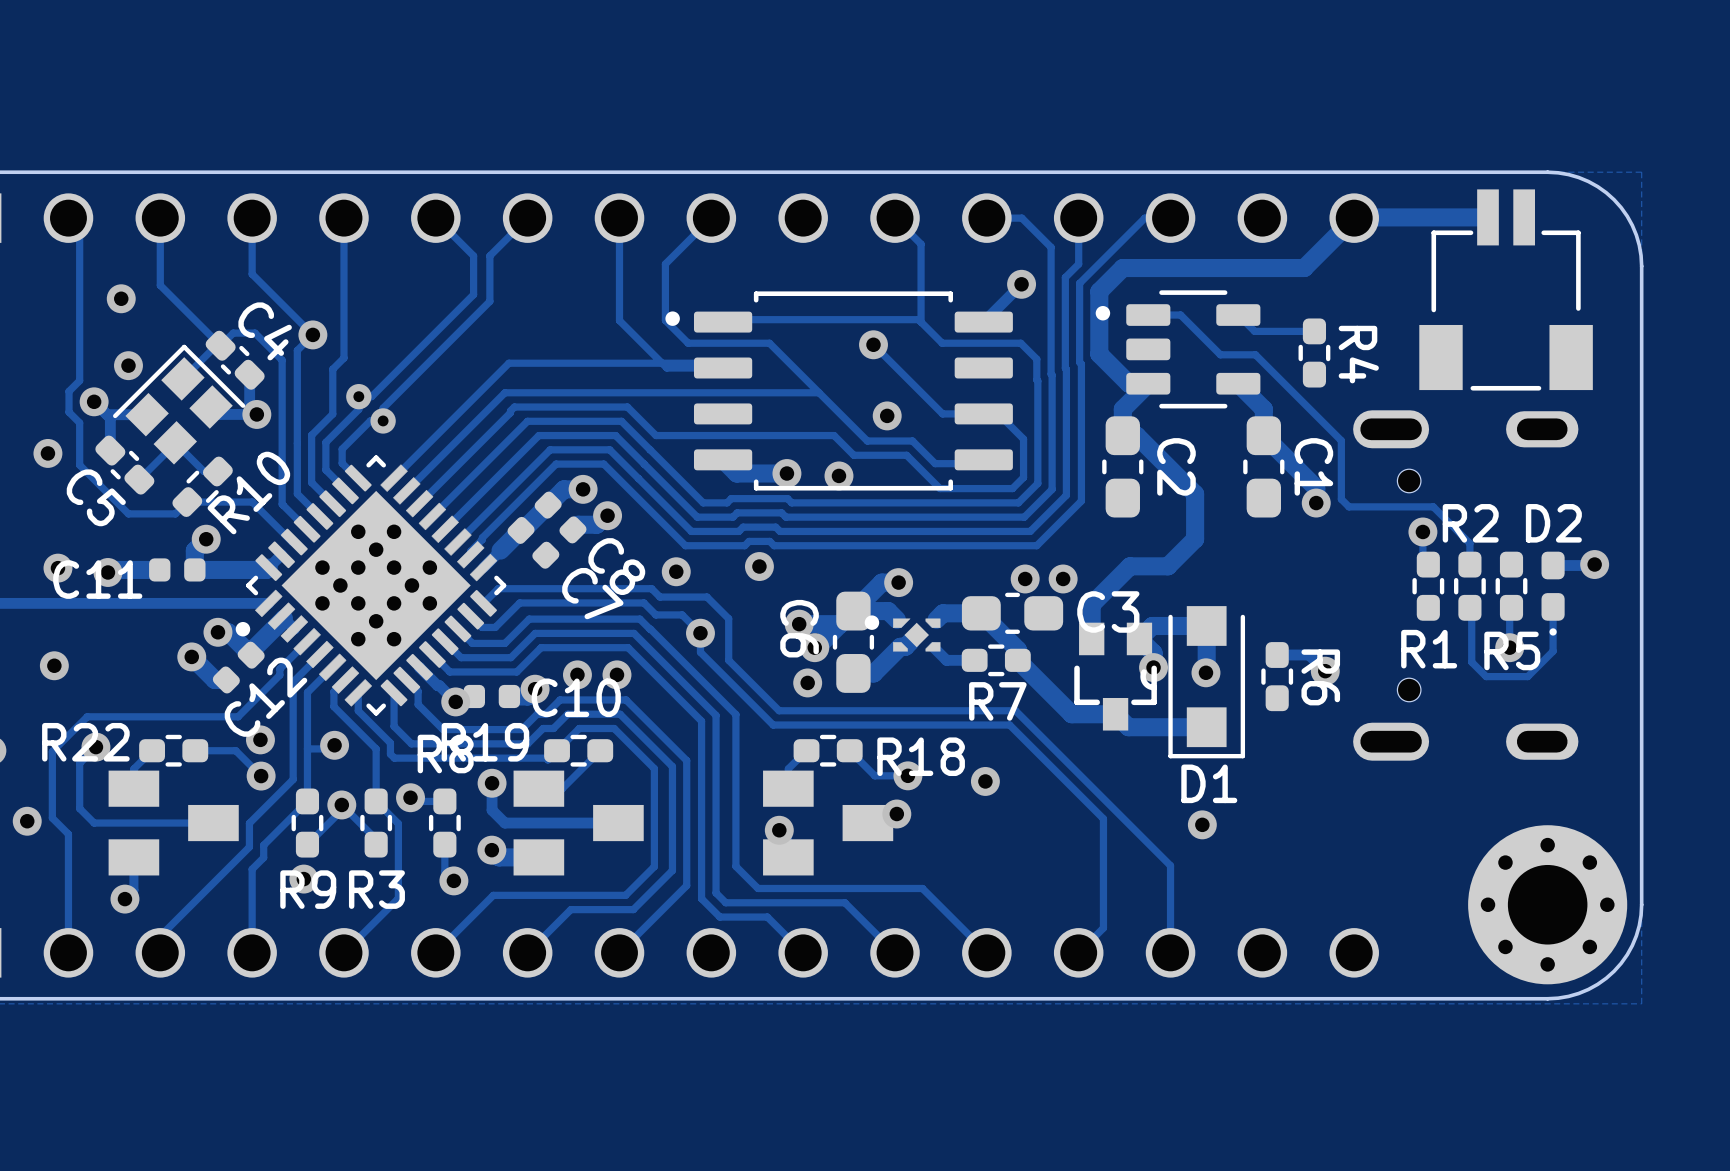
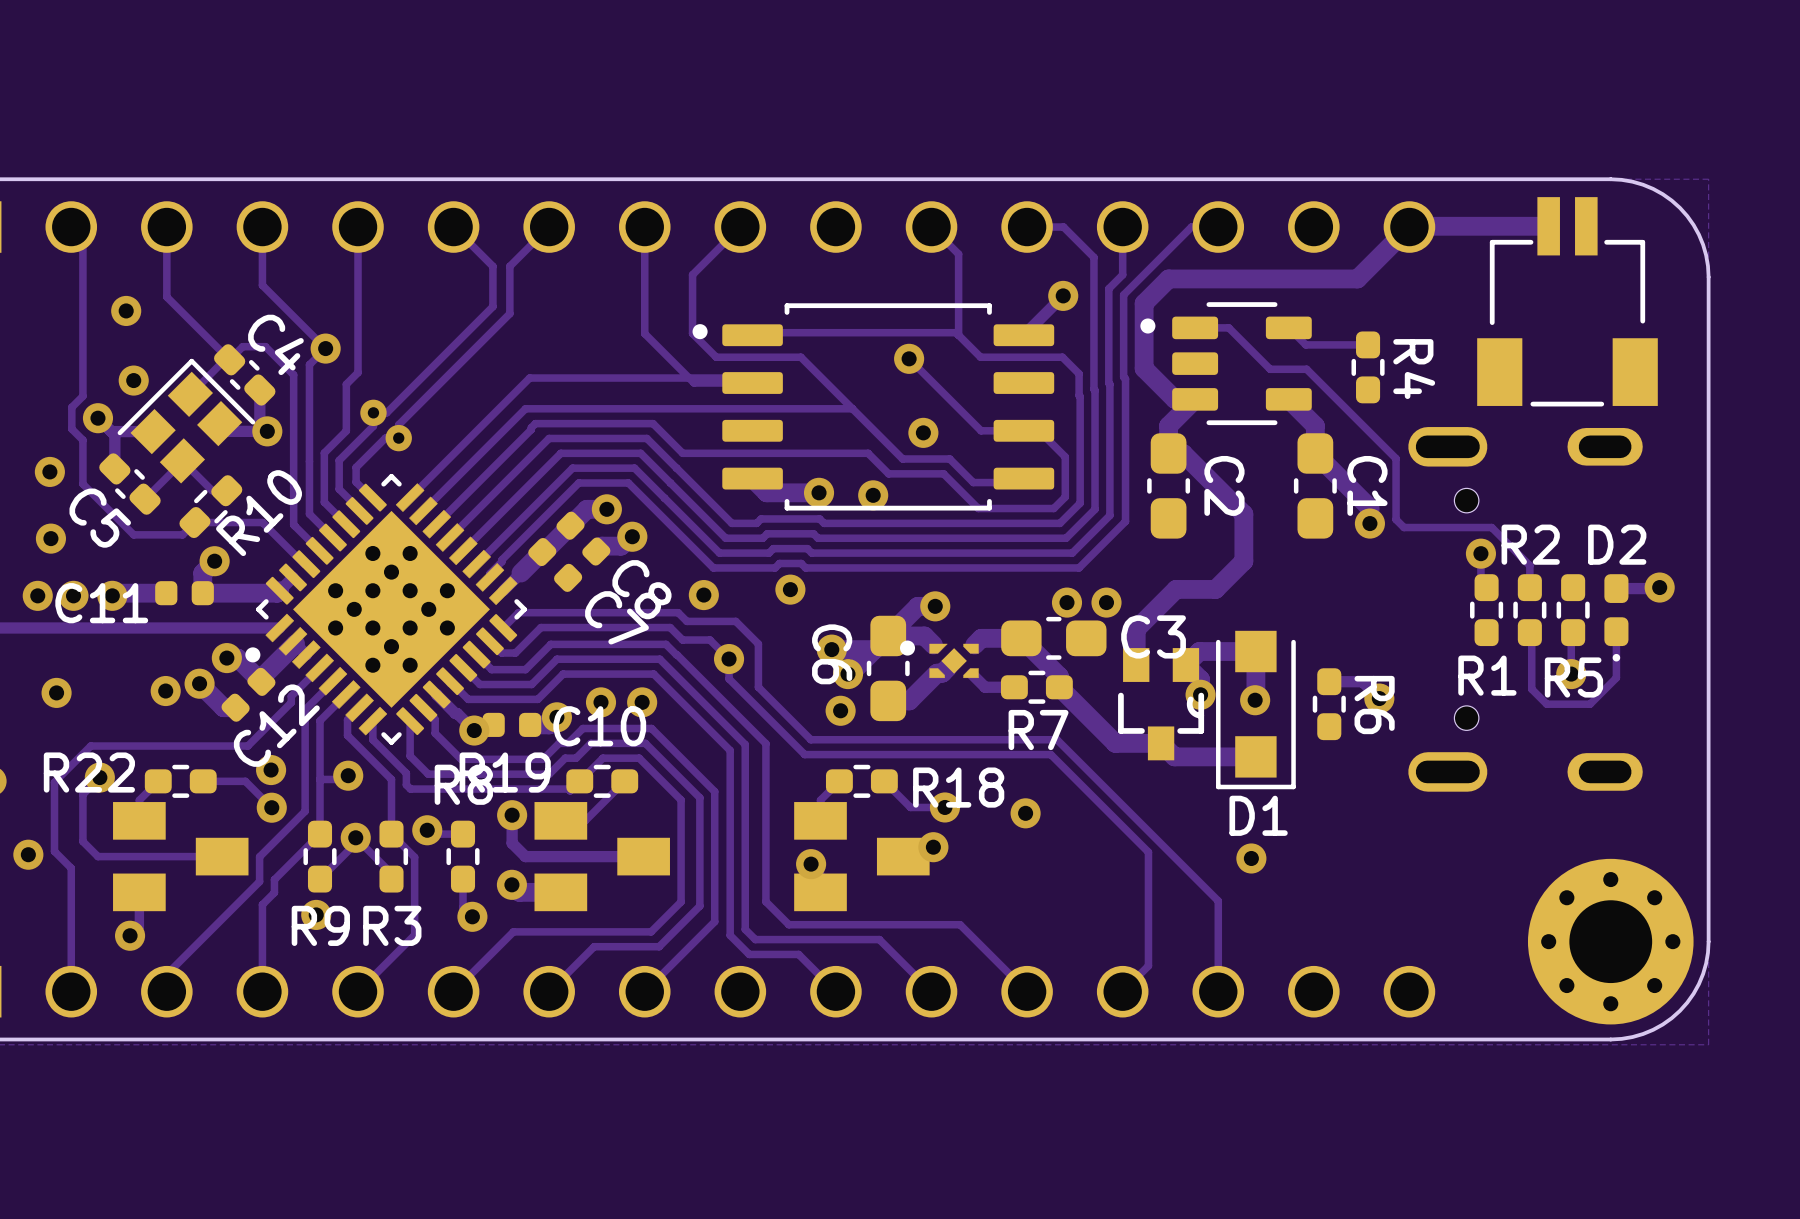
via: none -> (50, 538)
via: (57, 568) -> none
via: none -> (37, 595)
via: none -> (73, 595)
via: none -> (165, 691)

